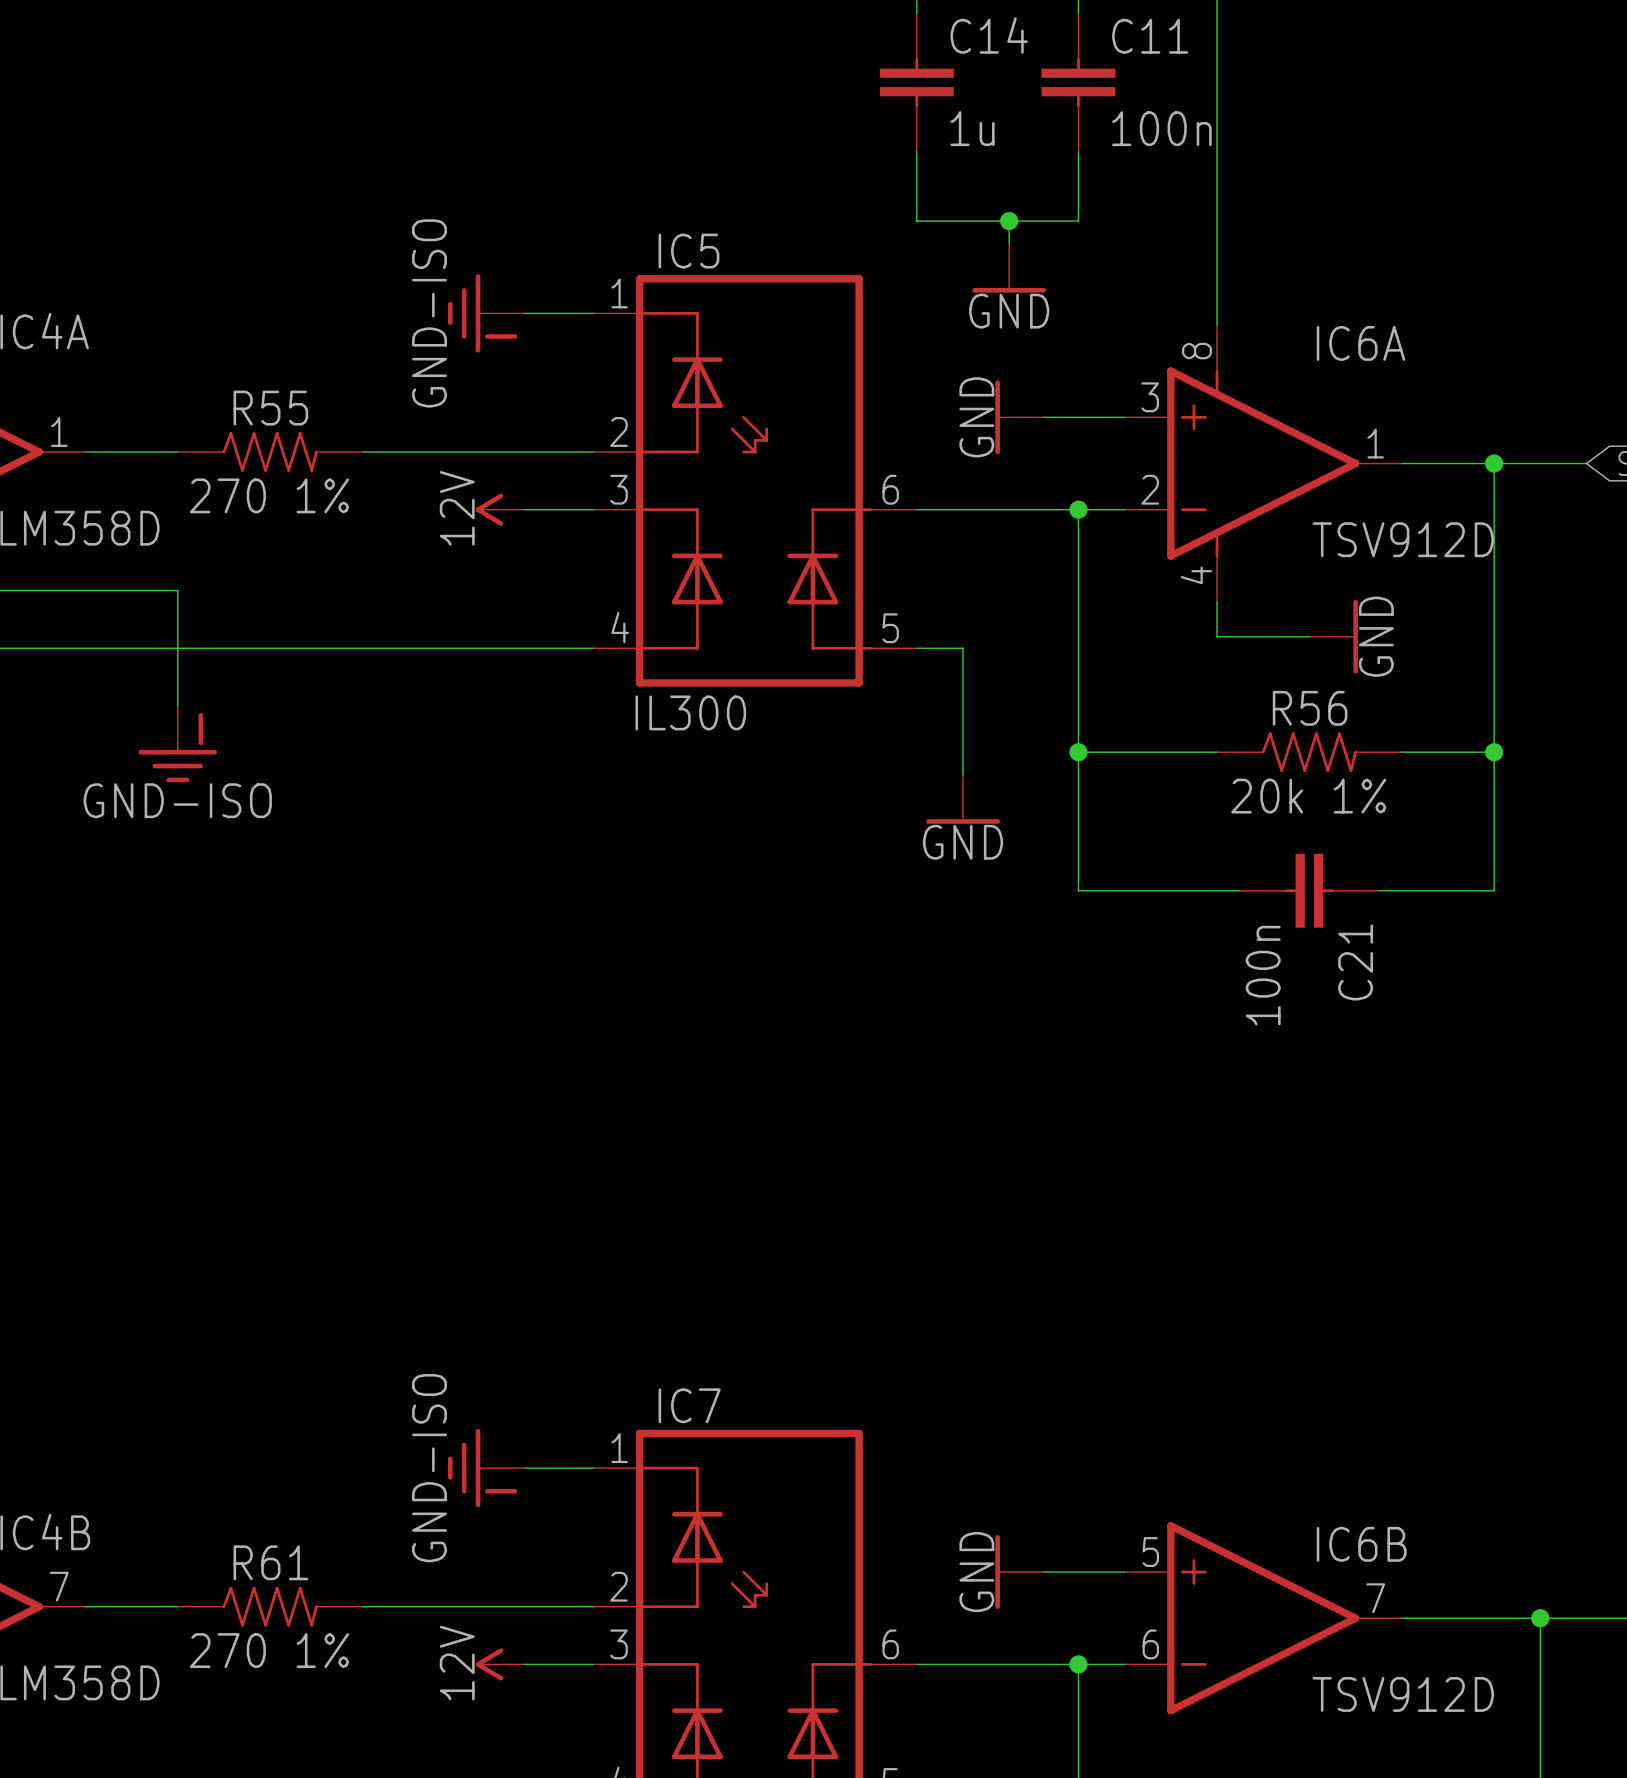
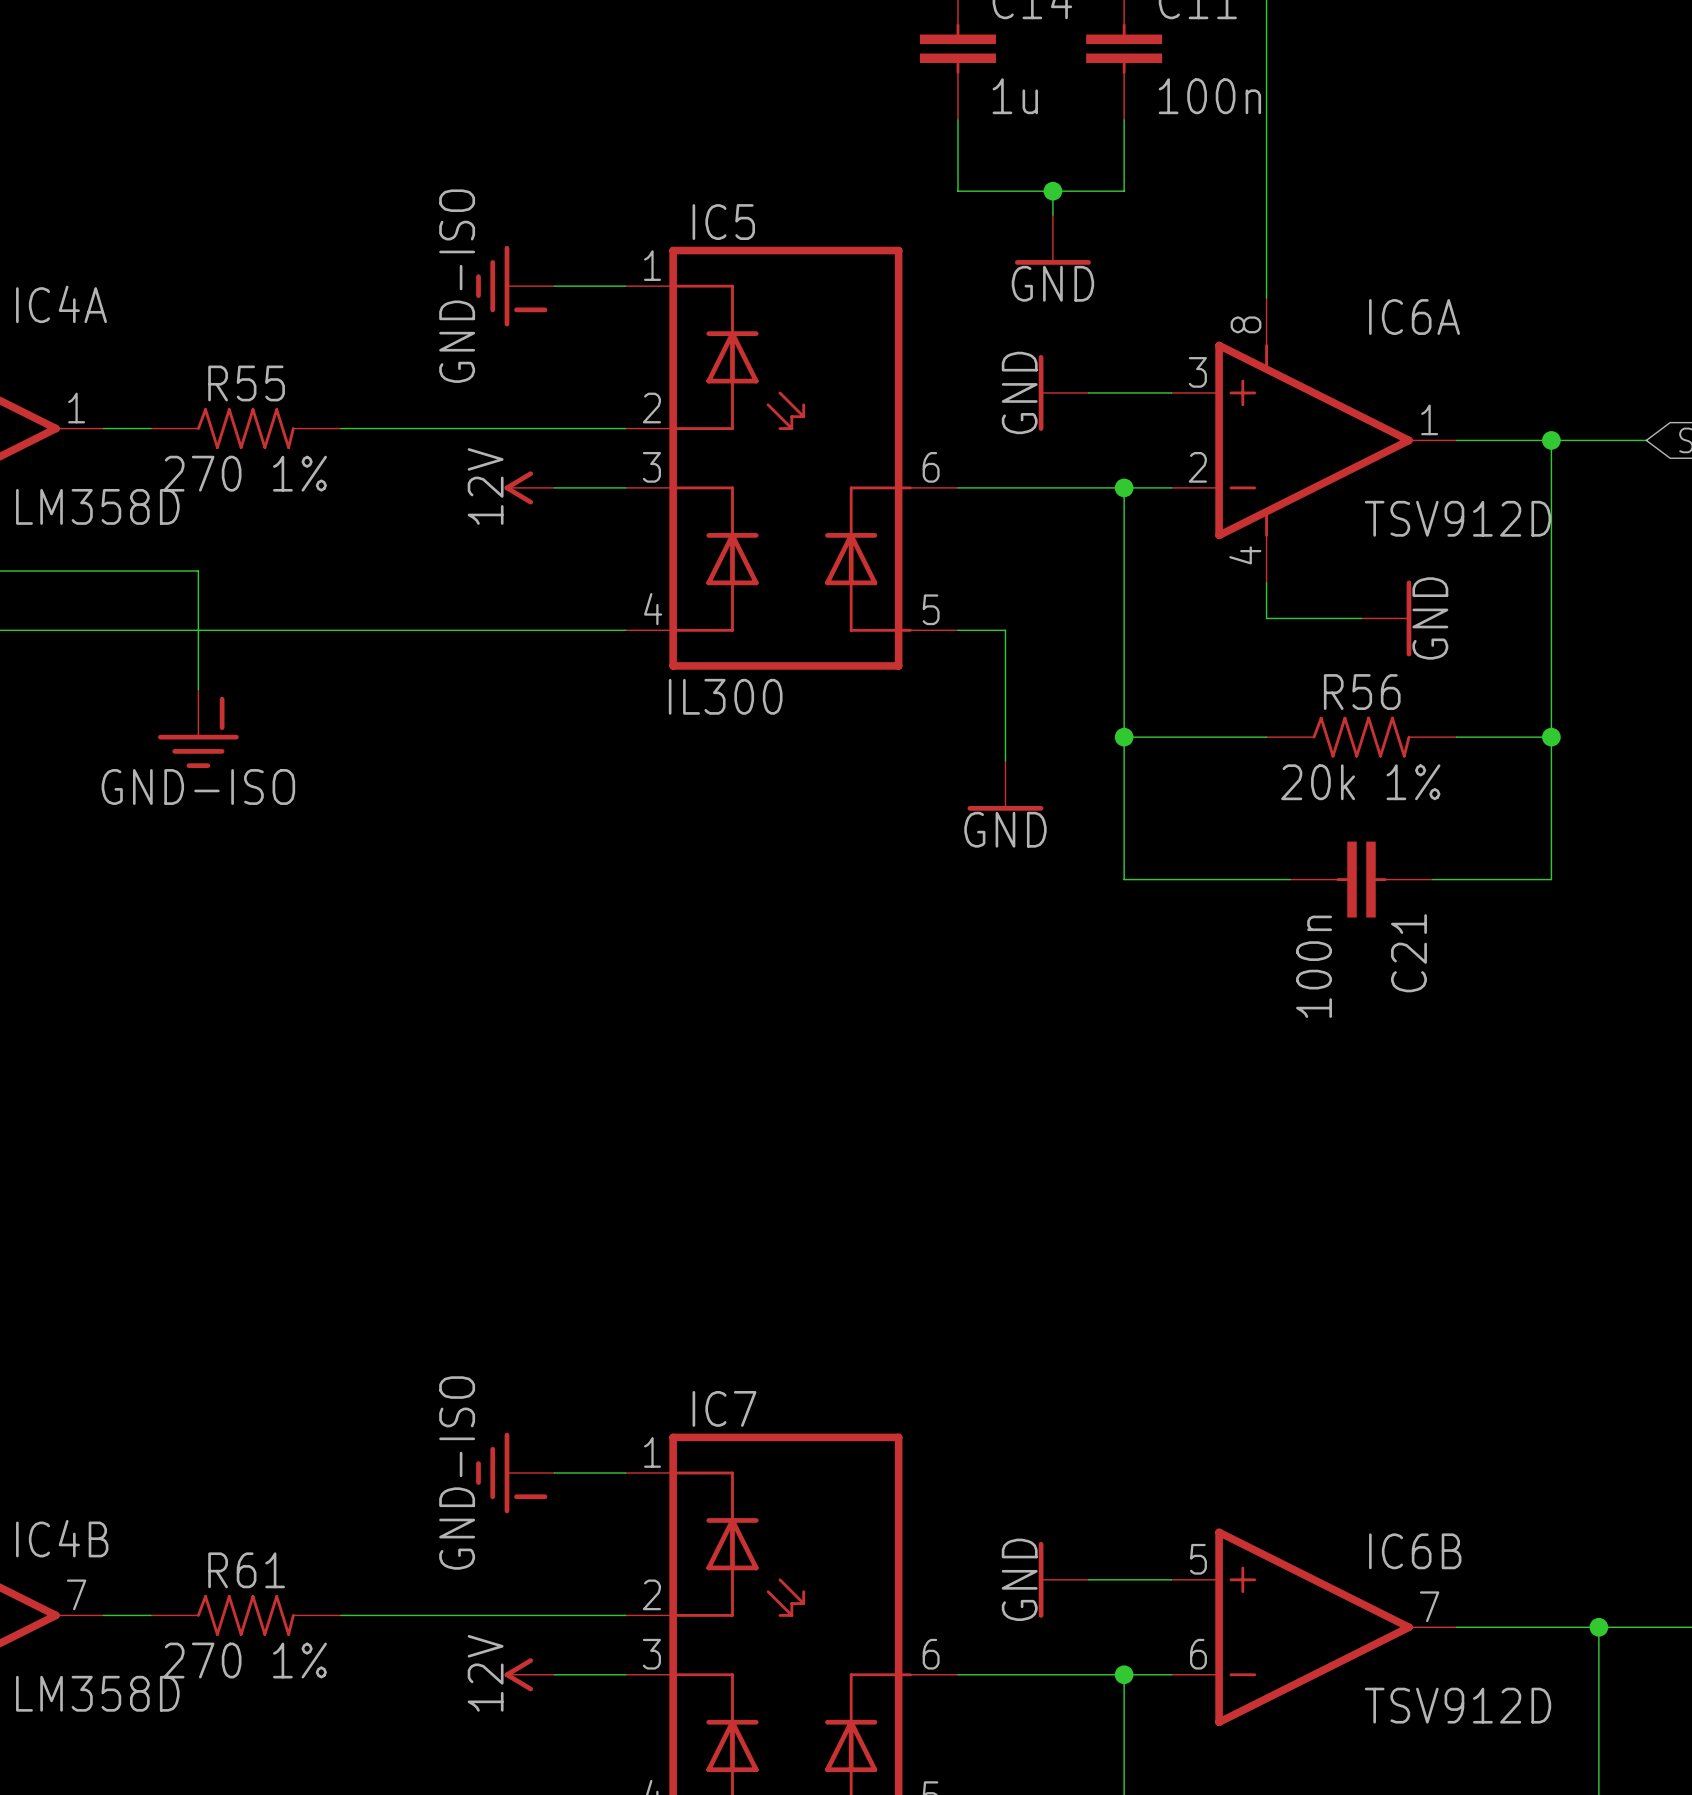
R55 position: (270, 451) -> (245, 428)
R61 position: (270, 1606) -> (245, 1615)

